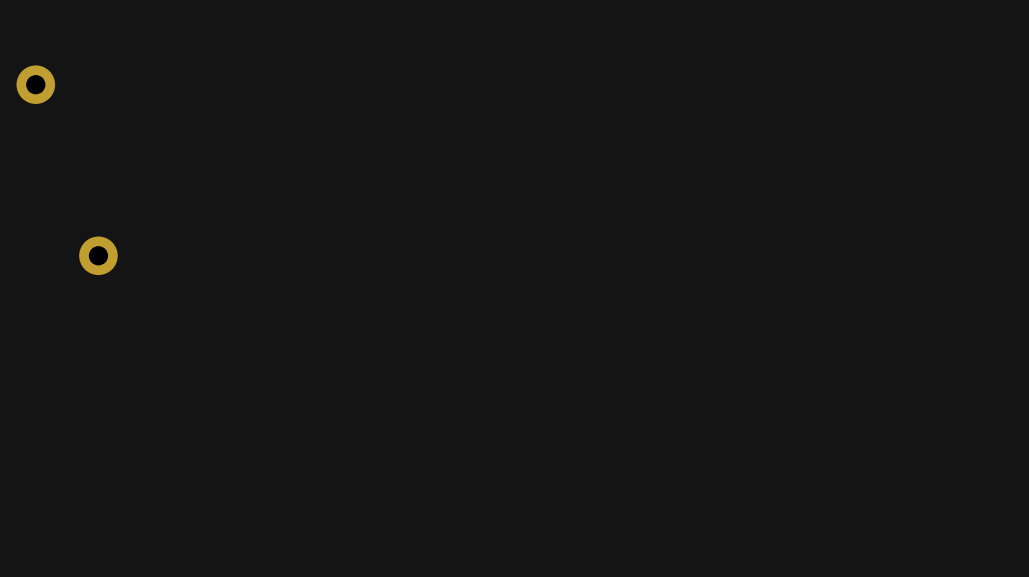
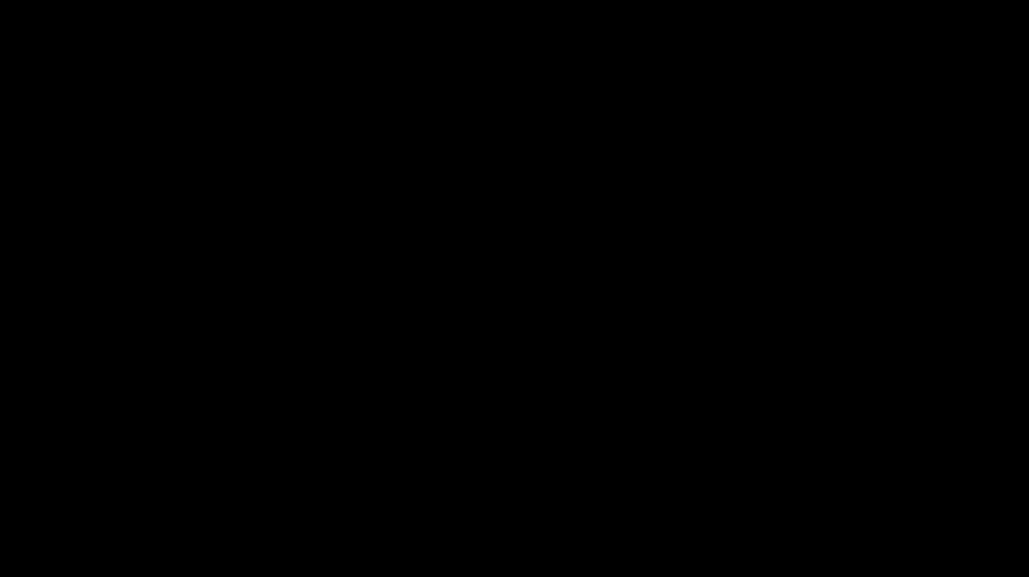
via: (35, 84) -> none
via: (98, 255) -> none

